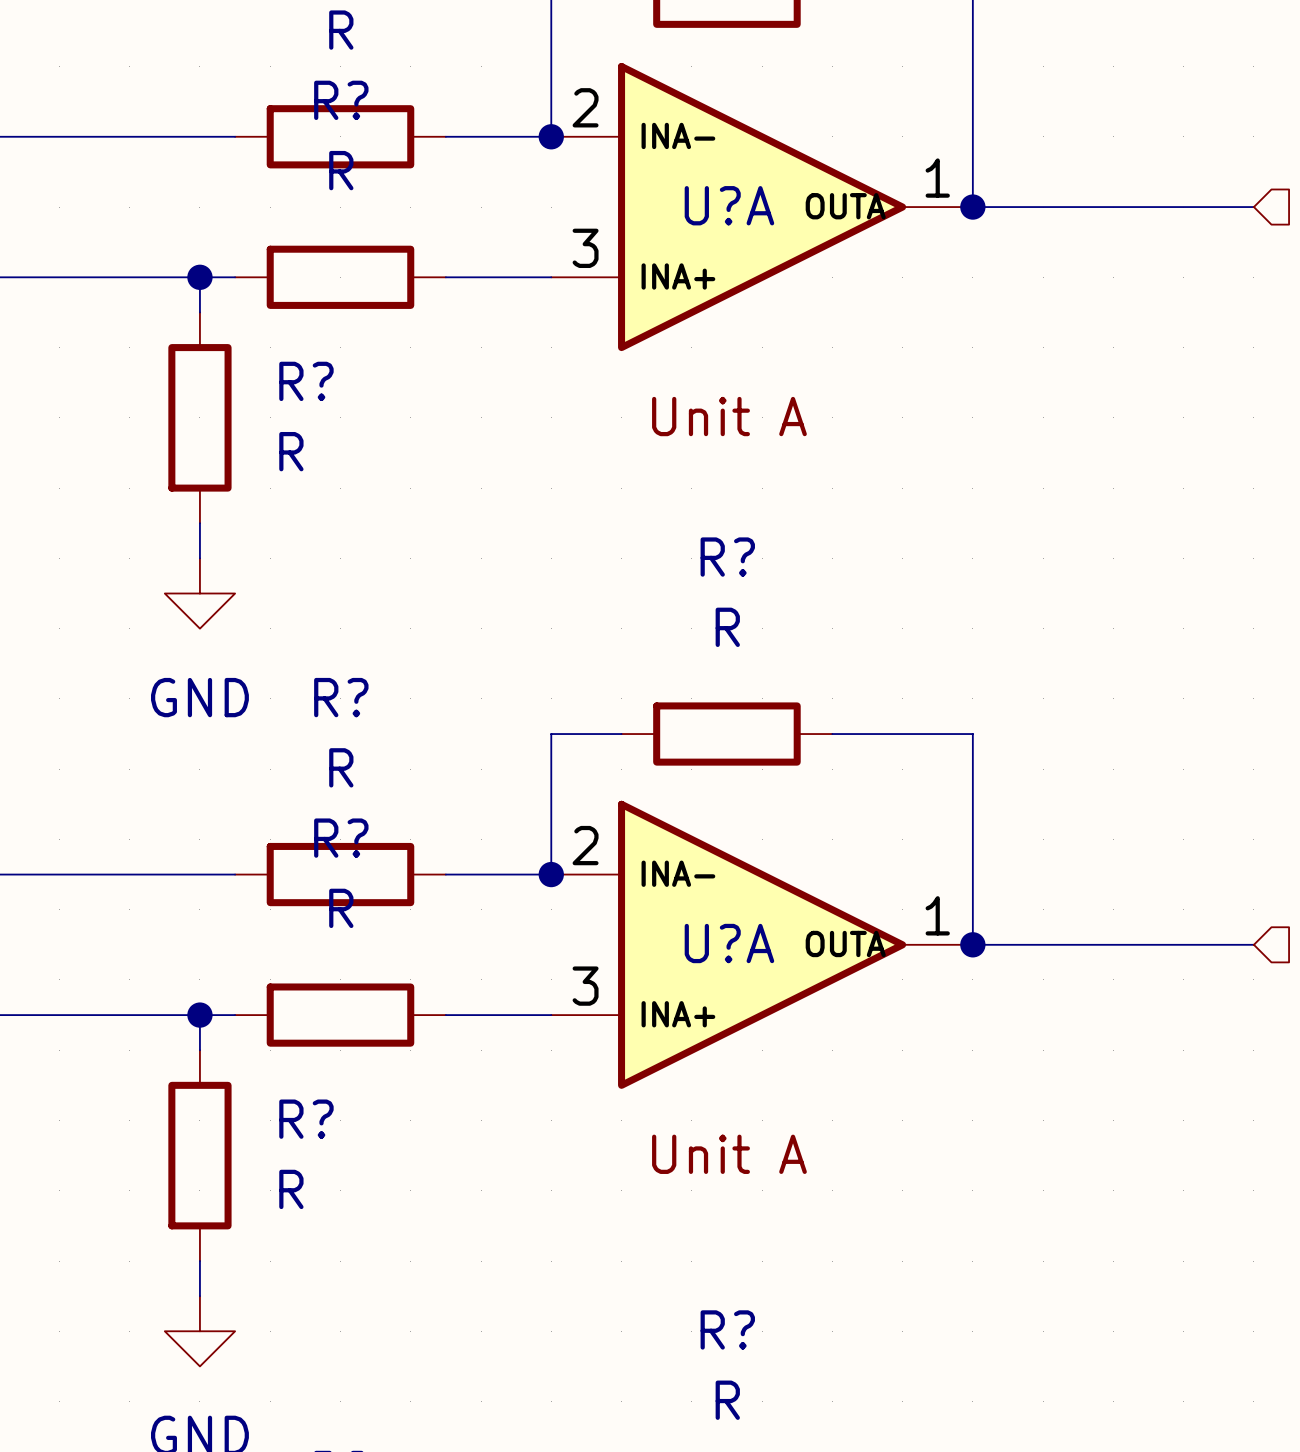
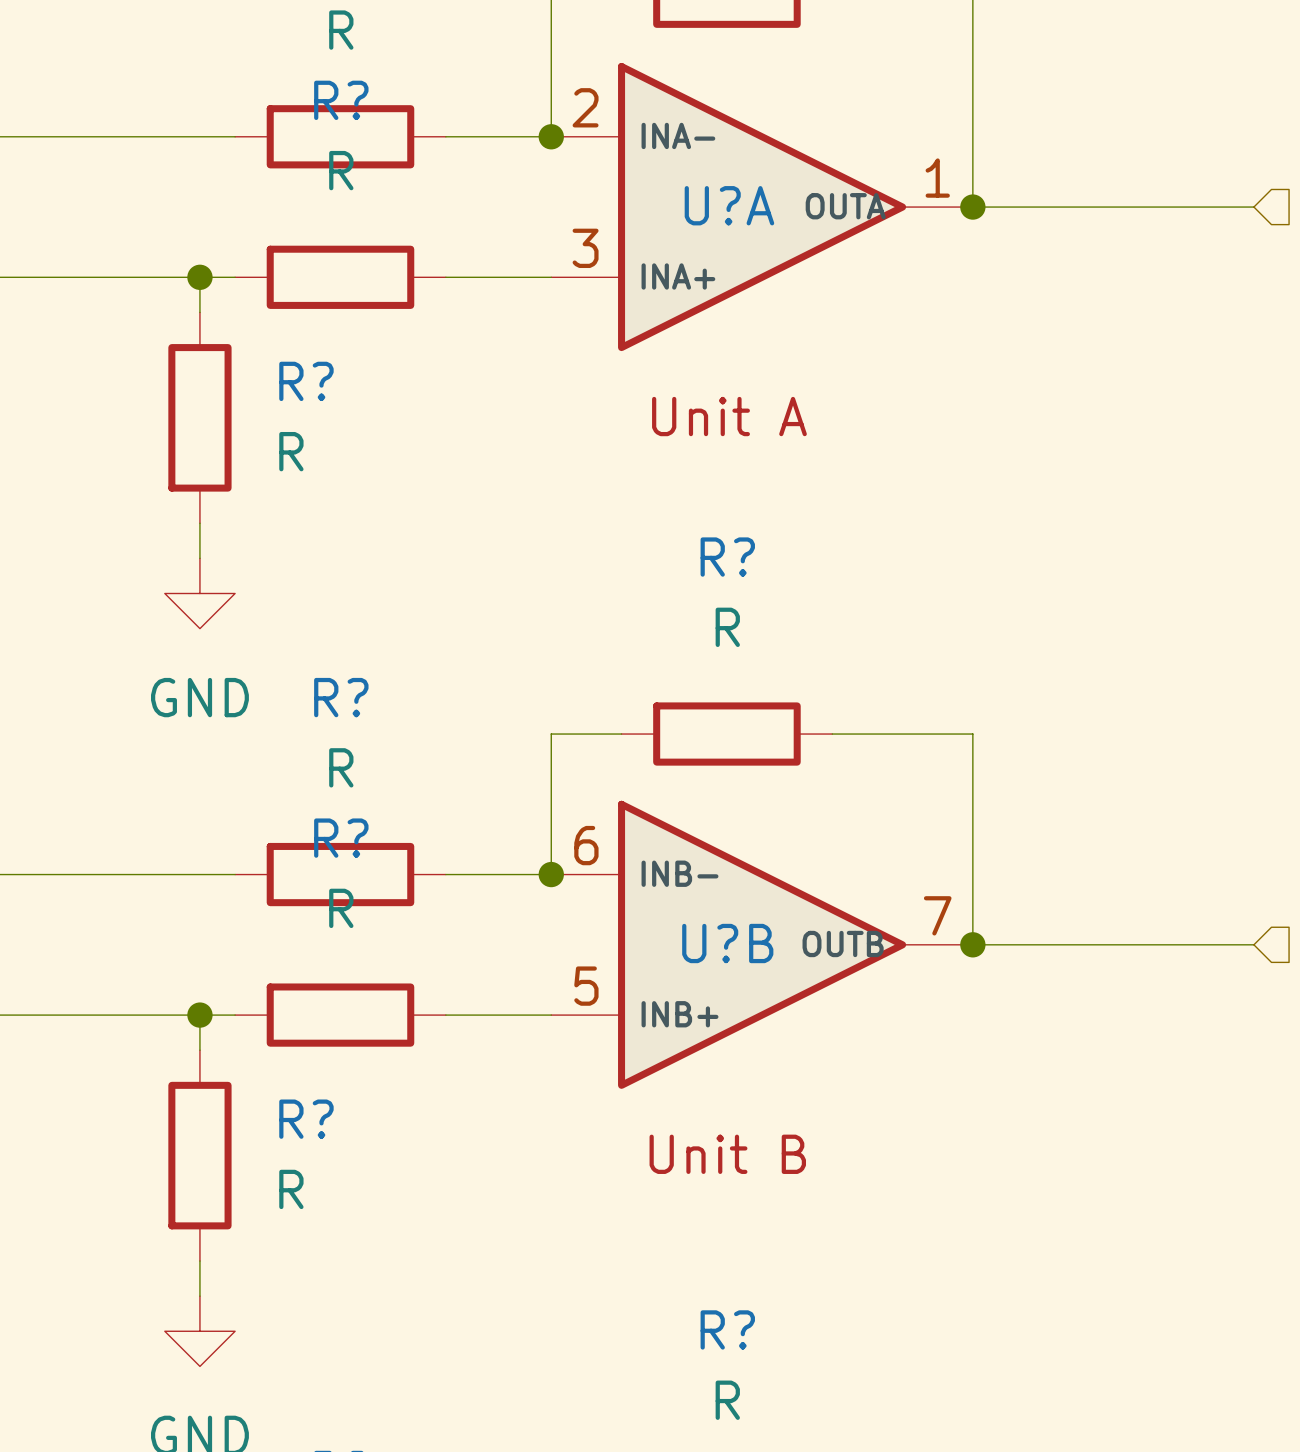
U?A pin number: 2 (585, 845) -> 6 (586, 845)
U?A pin name: INA- (678, 873) -> INB- (679, 873)
U?A pin number: 1 (937, 915) -> 7 (937, 915)
U?A name: U?A (729, 943) -> U?B (727, 943)
U?A pin name: OUTA (845, 943) -> OUTB (843, 943)
U?A pin number: 3 (585, 986) -> 5 (586, 986)
U?A pin name: INA+ (678, 1014) -> INB+ (679, 1014)
U?A text: Unit A (729, 1154) -> Unit B (727, 1154)

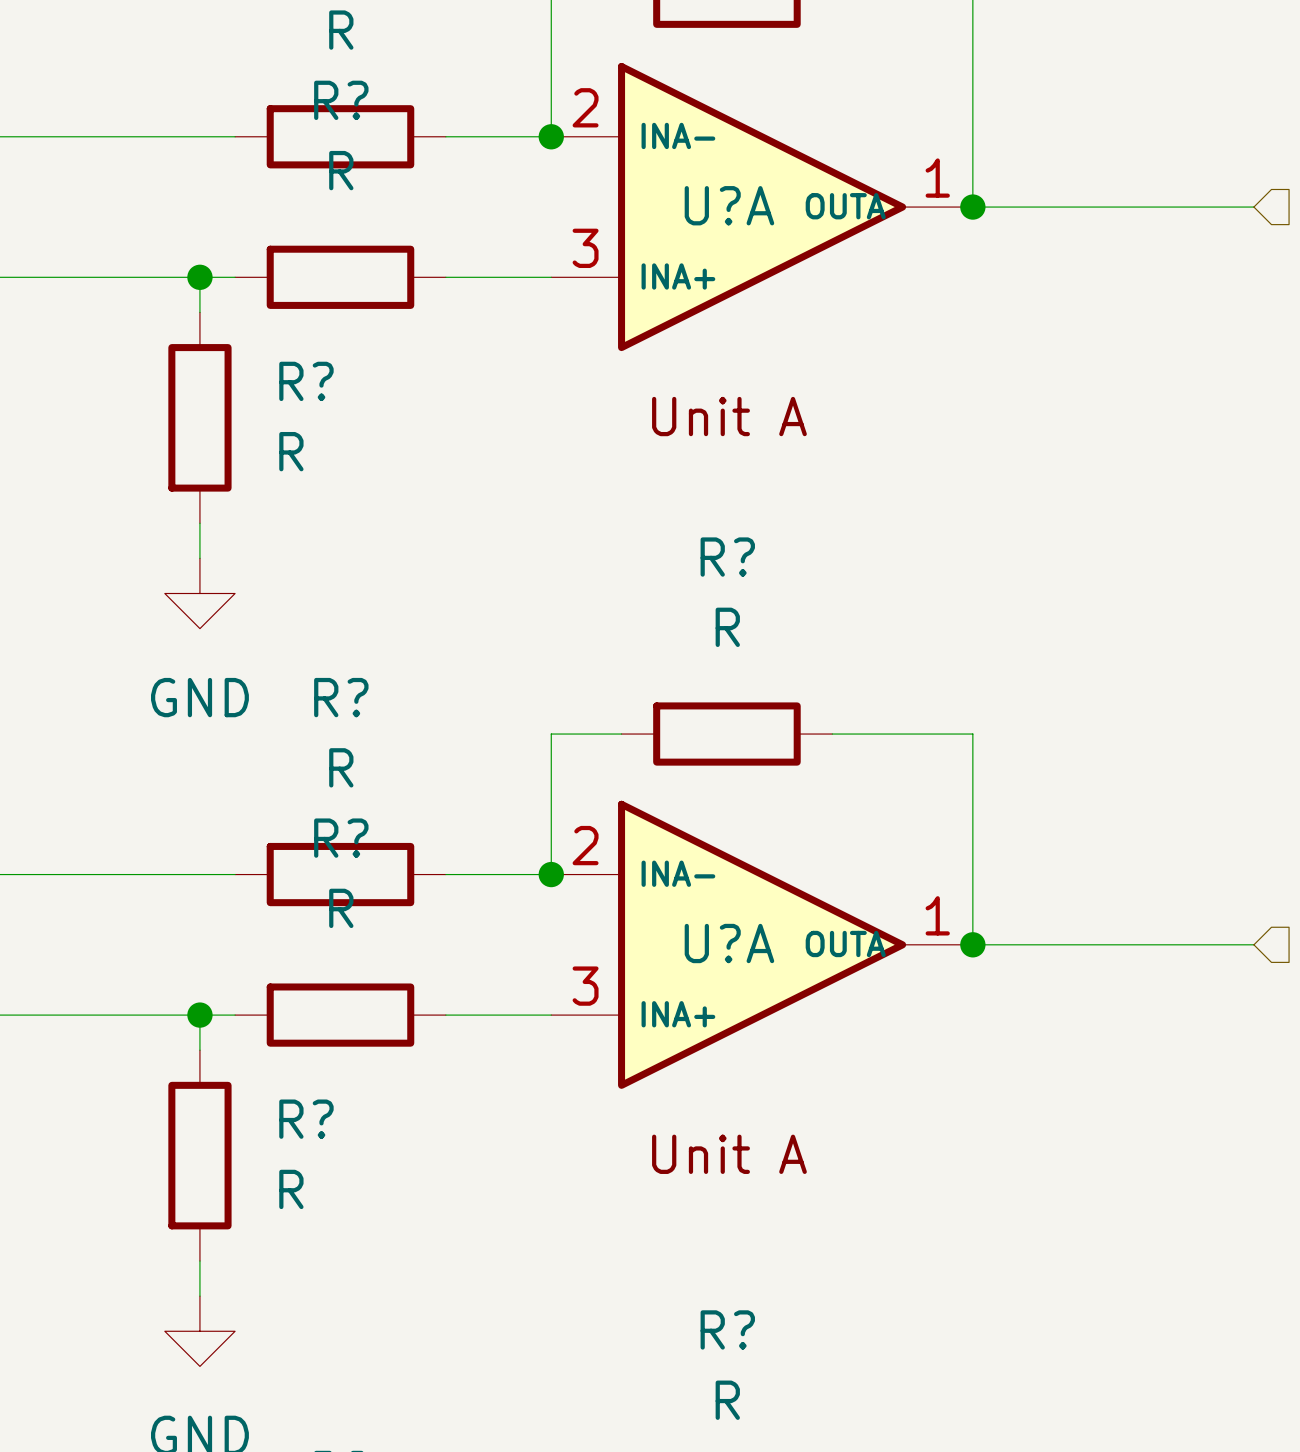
U?B pin number: 6 (586, 845) -> 2 (585, 845)
U?B pin name: INB- (679, 873) -> INA- (678, 873)
U?B pin number: 7 (937, 915) -> 1 (937, 915)
U?B name: U?B (727, 943) -> U?A (729, 943)
U?B pin name: OUTB (843, 943) -> OUTA (845, 943)
U?B pin number: 5 (586, 986) -> 3 (585, 986)
U?B pin name: INB+ (679, 1014) -> INA+ (678, 1014)
U?B text: Unit B (727, 1154) -> Unit A (729, 1154)

